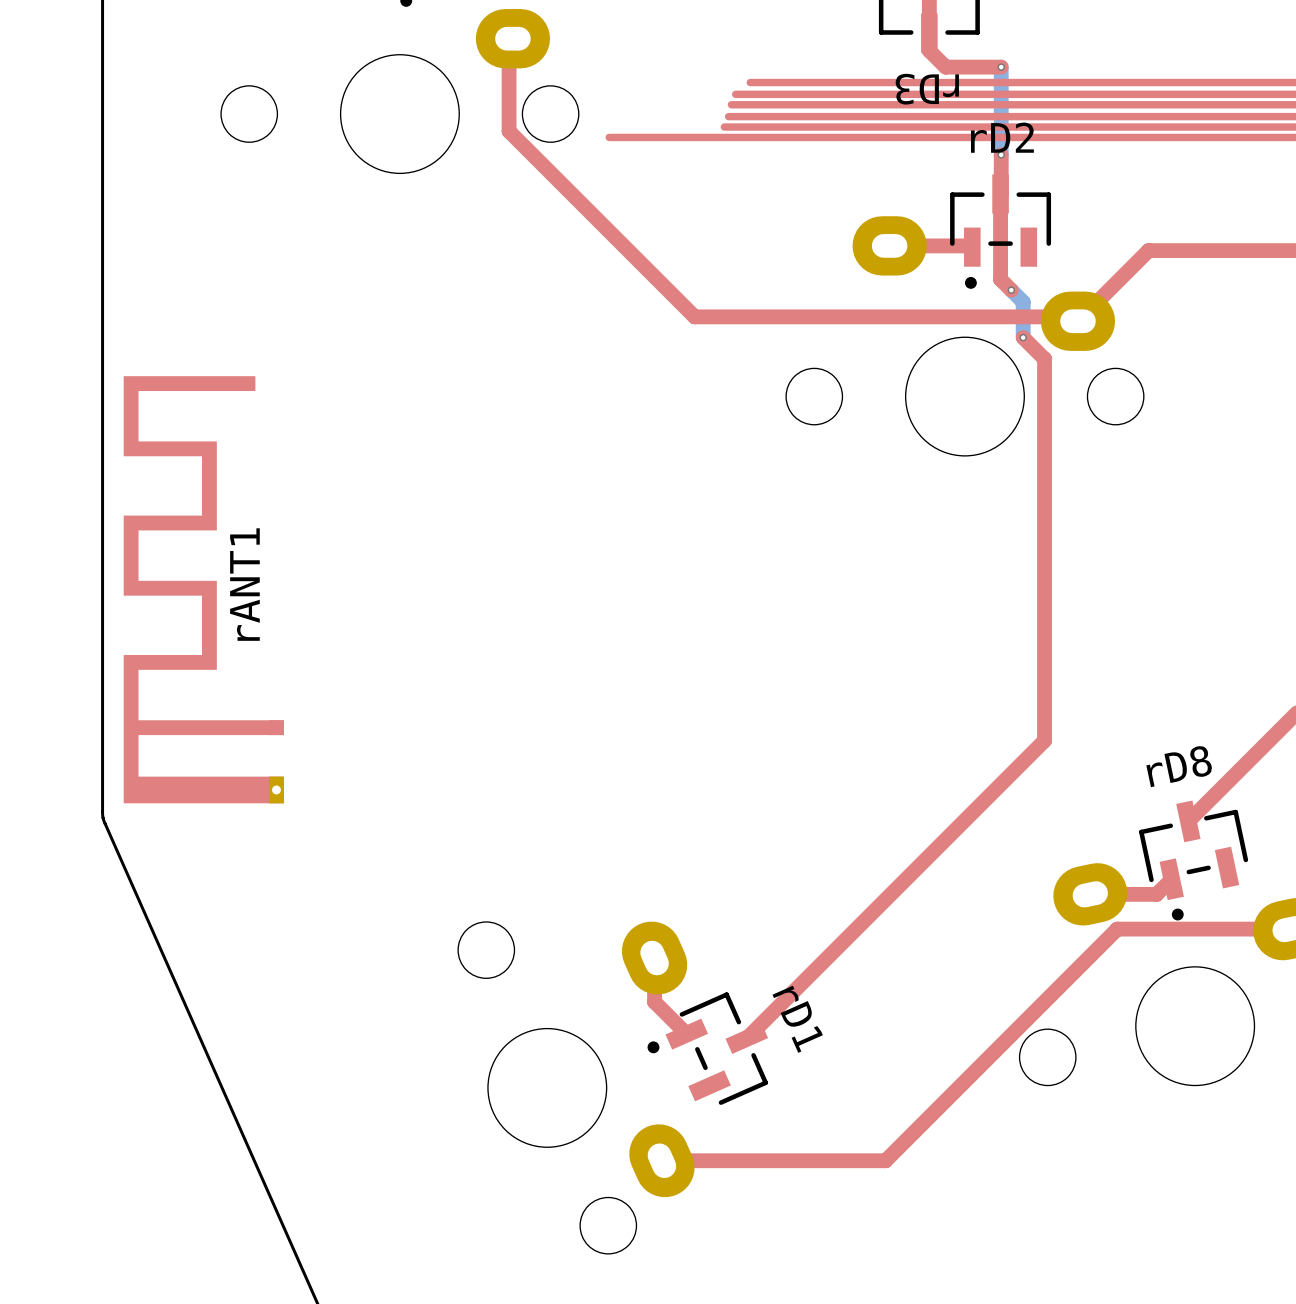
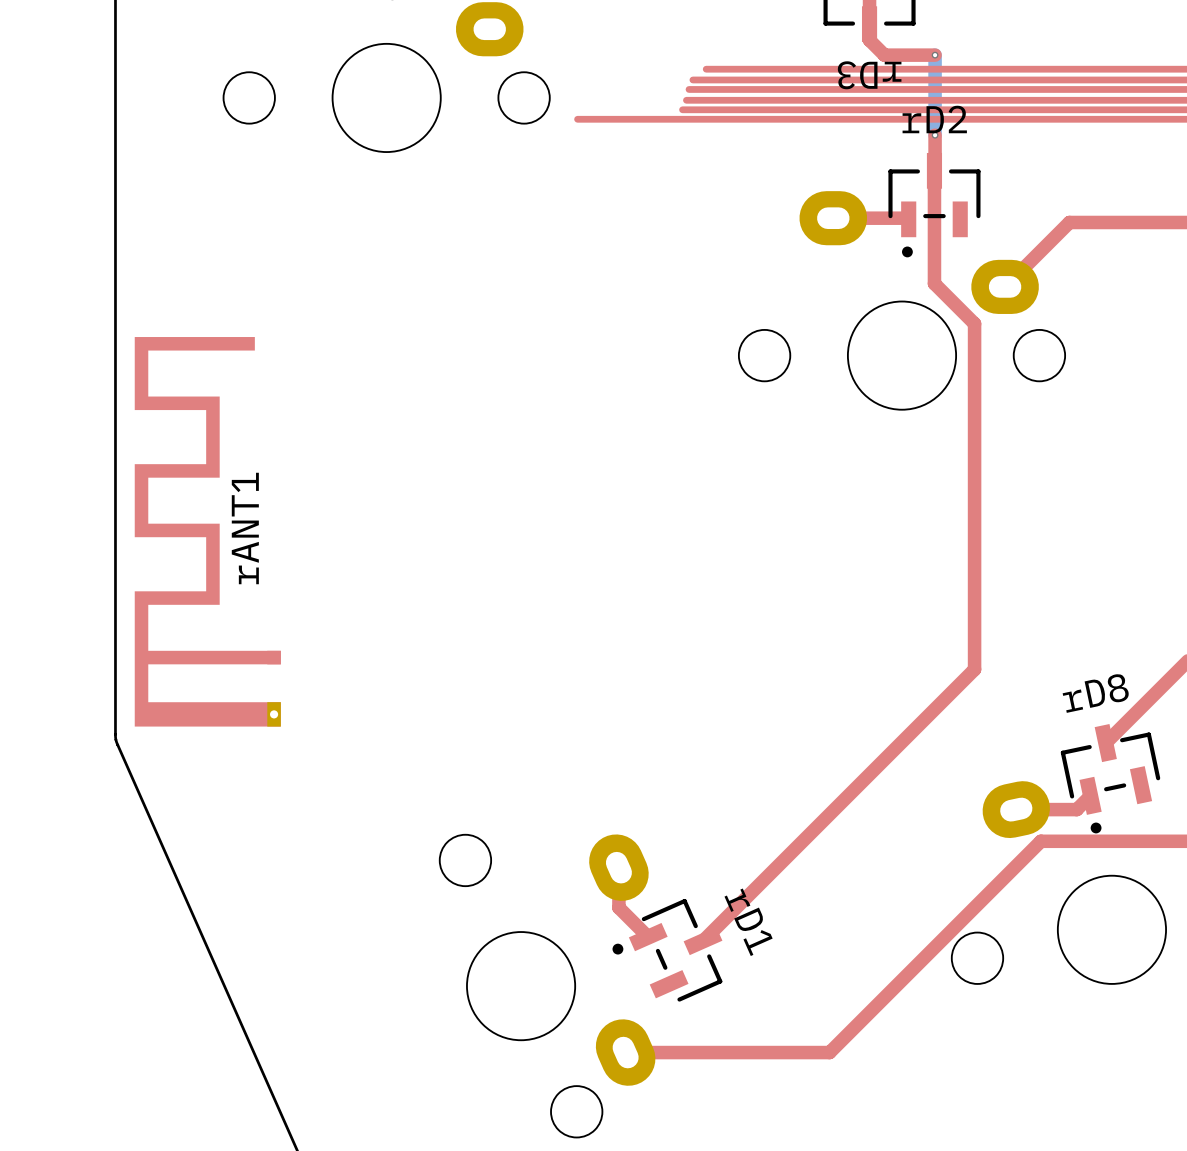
top track: (512, 38) (509, 42) (509, 131) (694, 316) (1073, 316) (1077, 321) -> none
top track: (1000, 279) (1011, 290) -> none
bottom track: (1011, 290) (1023, 302) (1023, 337) -> none
via: (1011, 290) -> none
top track: (1023, 337) (1044, 358) (1044, 361) -> (934, 248) (934, 283) (974, 323)
via: (1023, 337) -> none

